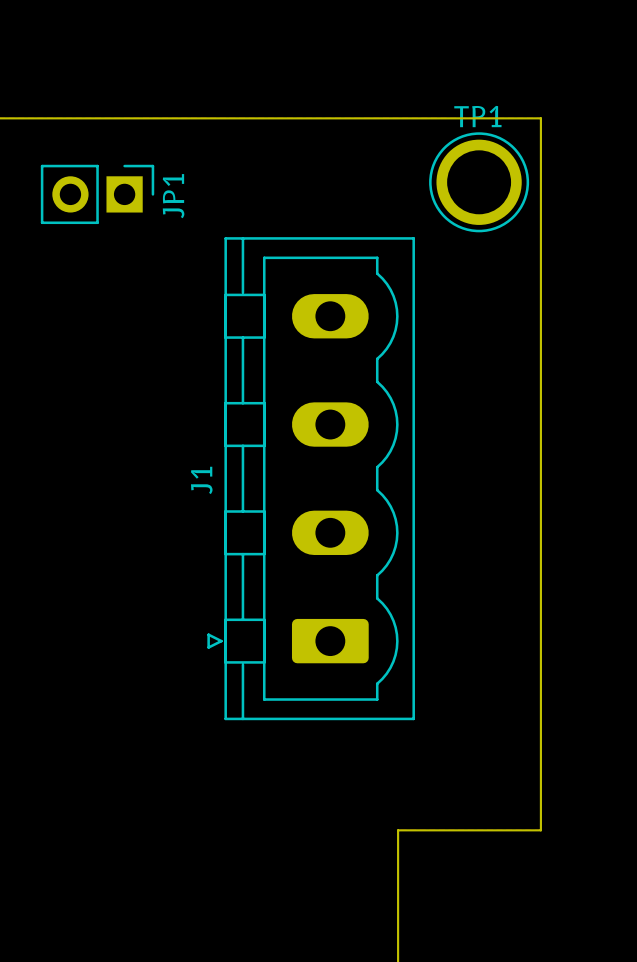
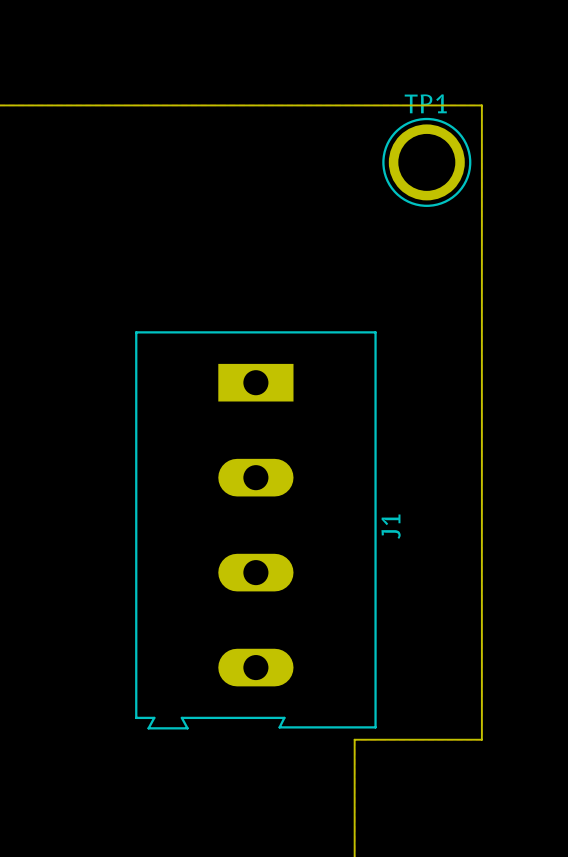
JP1: (97, 194) -> none
J1 footprint: [207, 237, 415, 721] -> [135, 331, 377, 730]
J1 name position: J1 (201, 480) -> J1 (391, 526)

